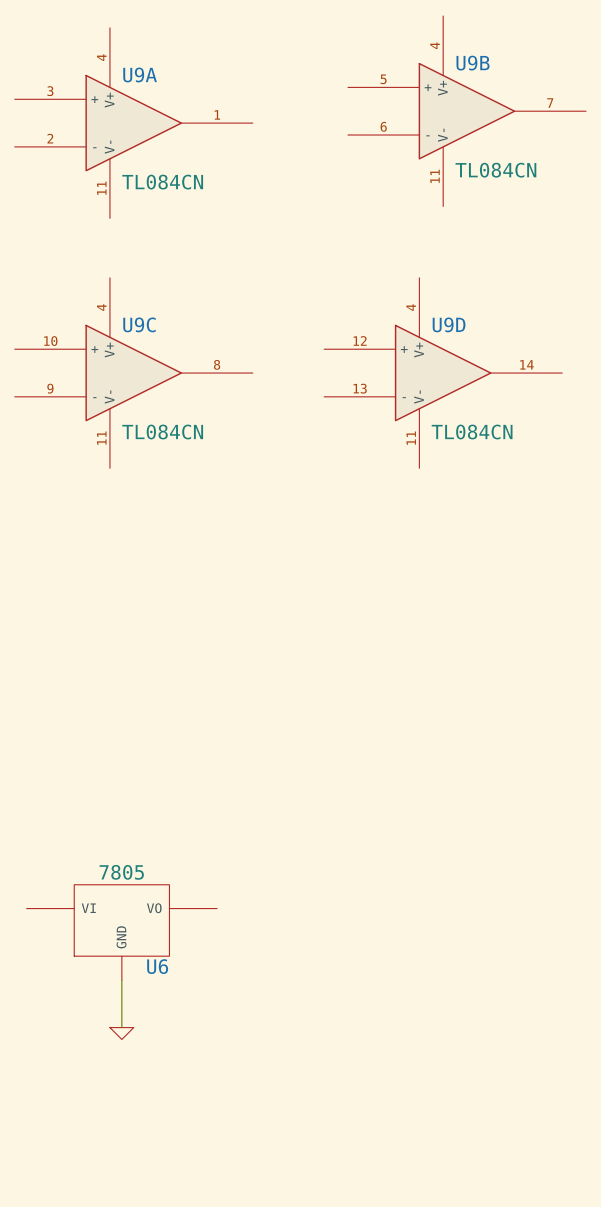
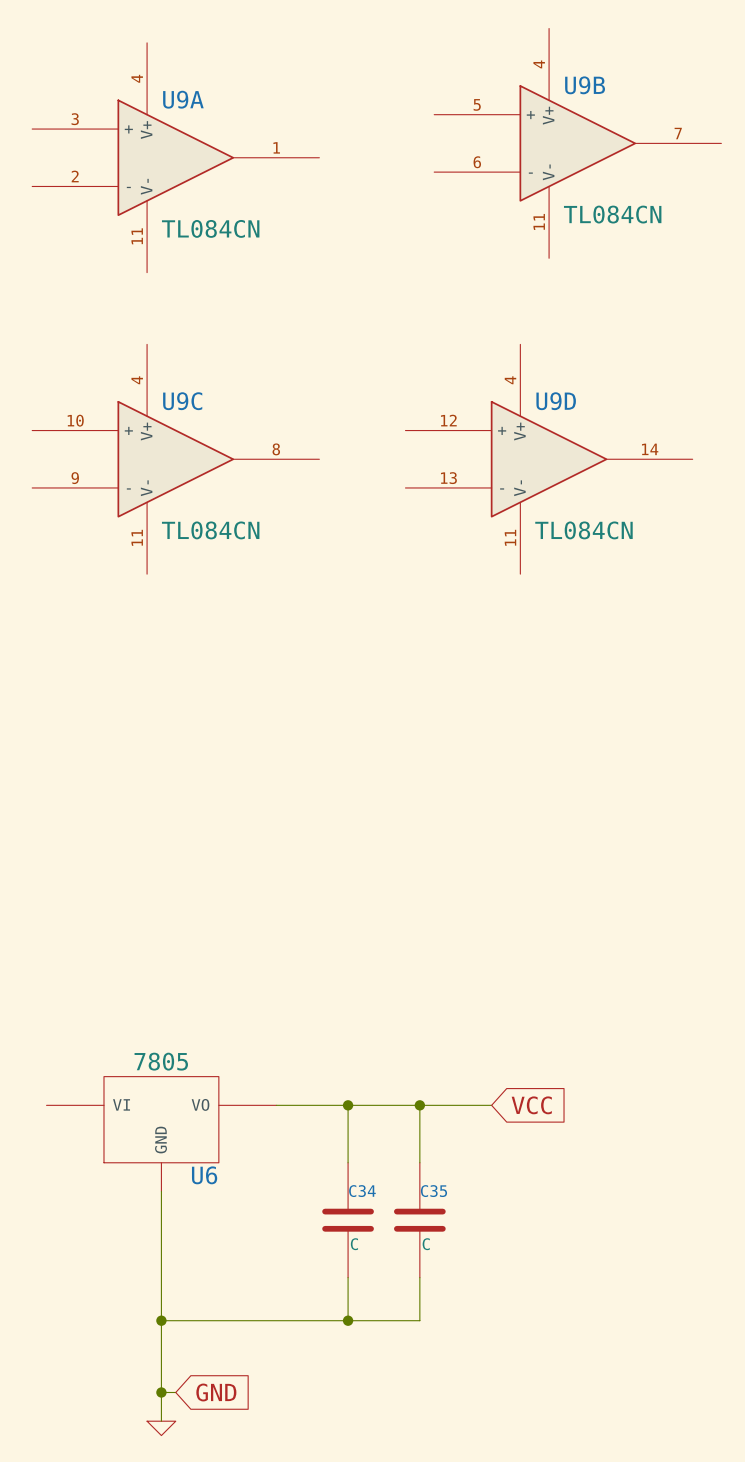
wire: none -> (276, 1105) (491, 1105)
wire: none -> (348, 1105) (348, 1162)
junction: none -> (348, 1105)
wire: none -> (419, 1105) (419, 1162)
junction: none -> (419, 1105)
global label: none -> VCC (531, 1105)
C34: none -> C (348, 1220)
C35: none -> C (419, 1220)
wire: none -> (161, 1248) (161, 1421)
power symbol position: (121, 1033) -> (161, 1428)
wire: none -> (348, 1277) (348, 1320)
wire: none -> (419, 1277) (419, 1320) (161, 1320)
junction: none -> (161, 1320)
junction: none -> (348, 1320)
wire: none -> (161, 1392) (175, 1392)
junction: none -> (161, 1392)
global label: none -> GND (216, 1392)

